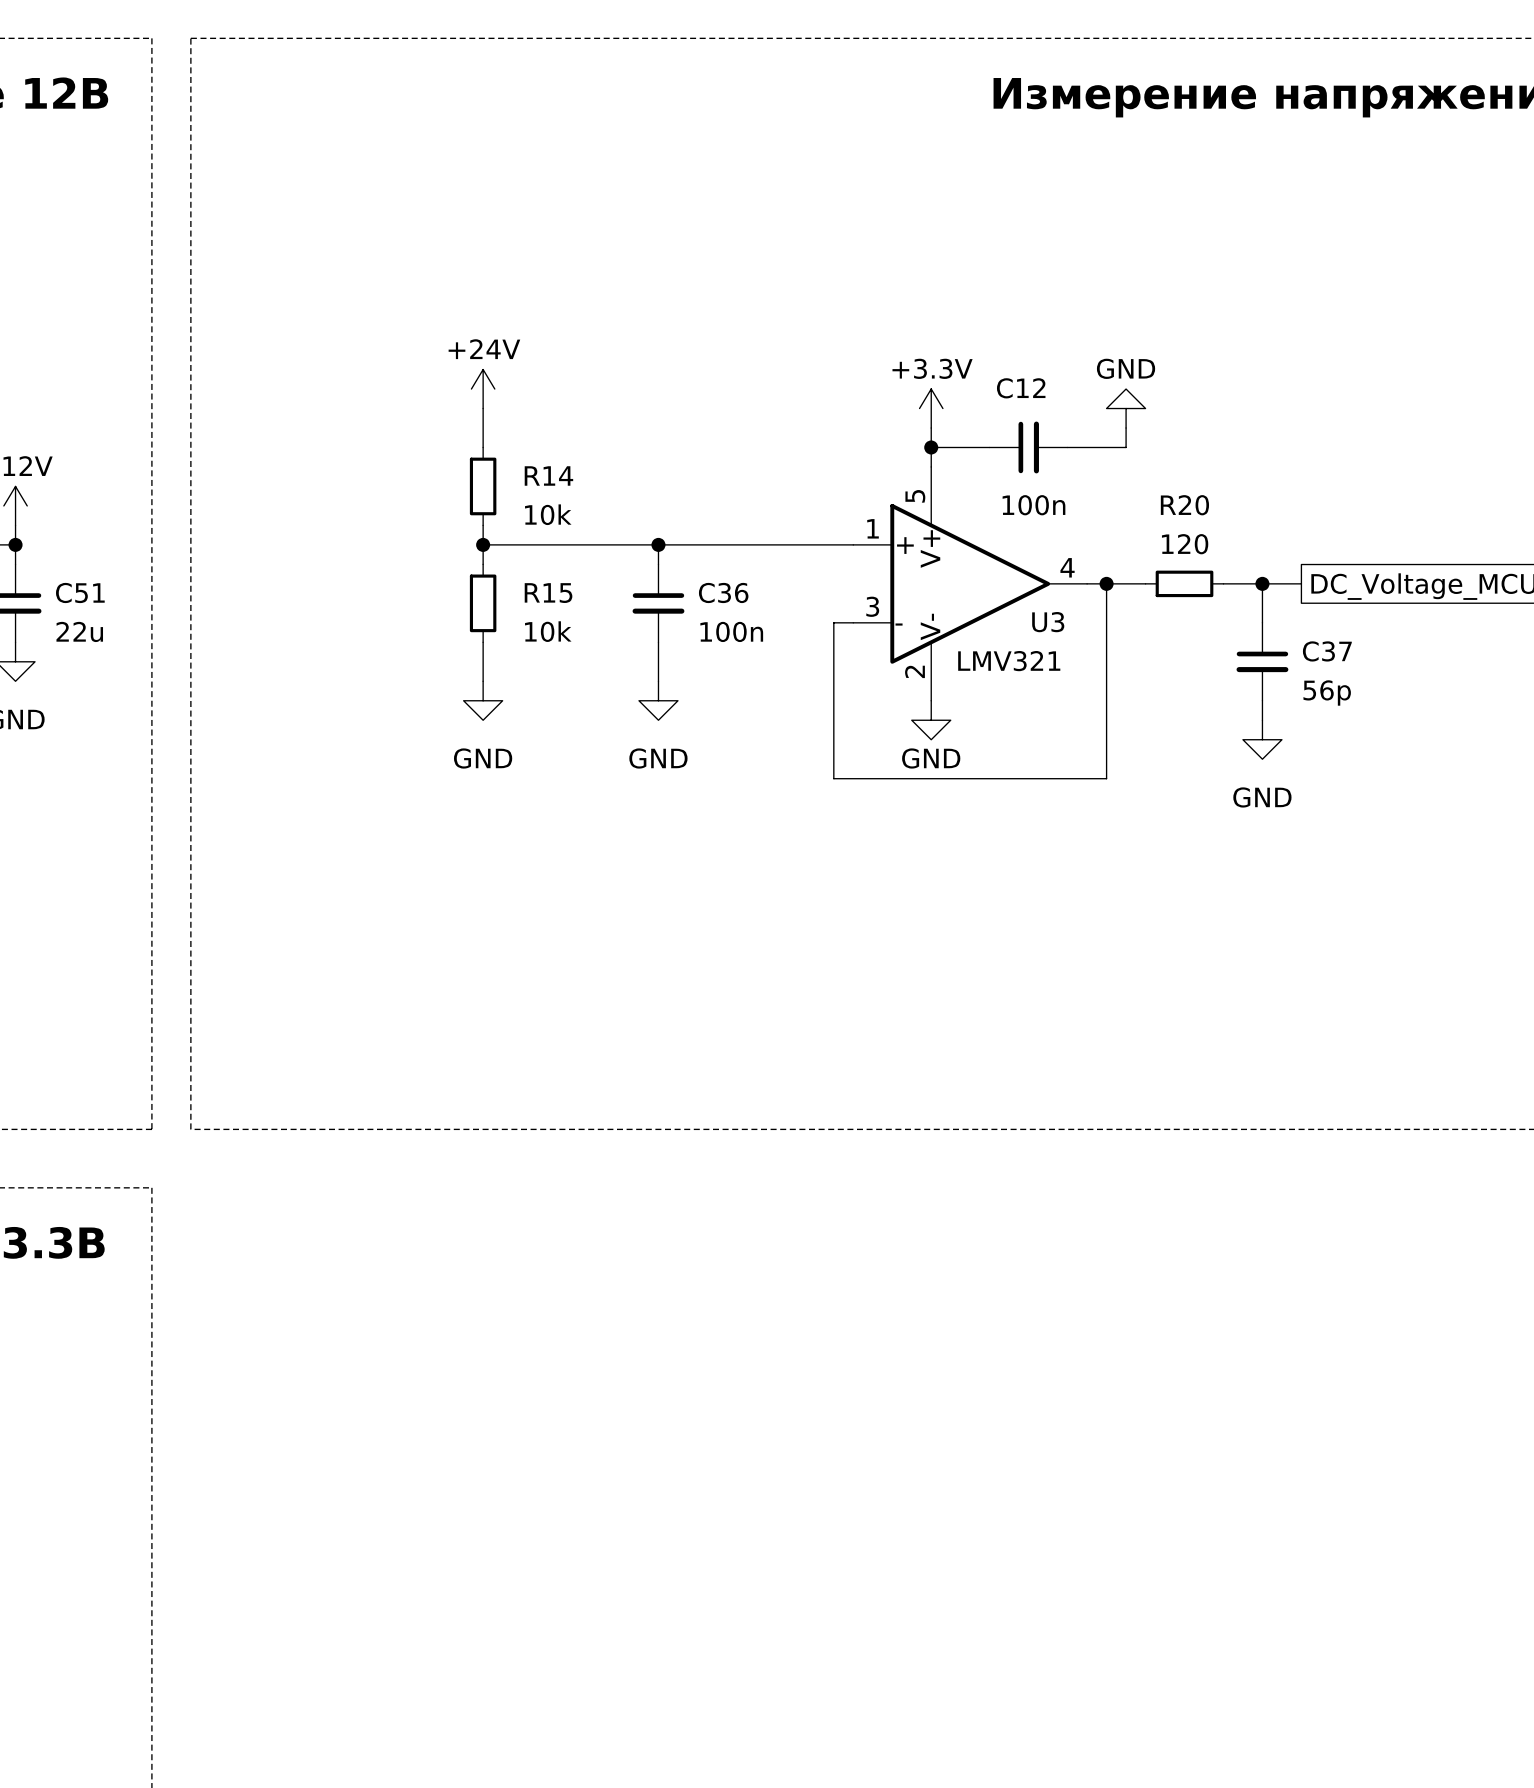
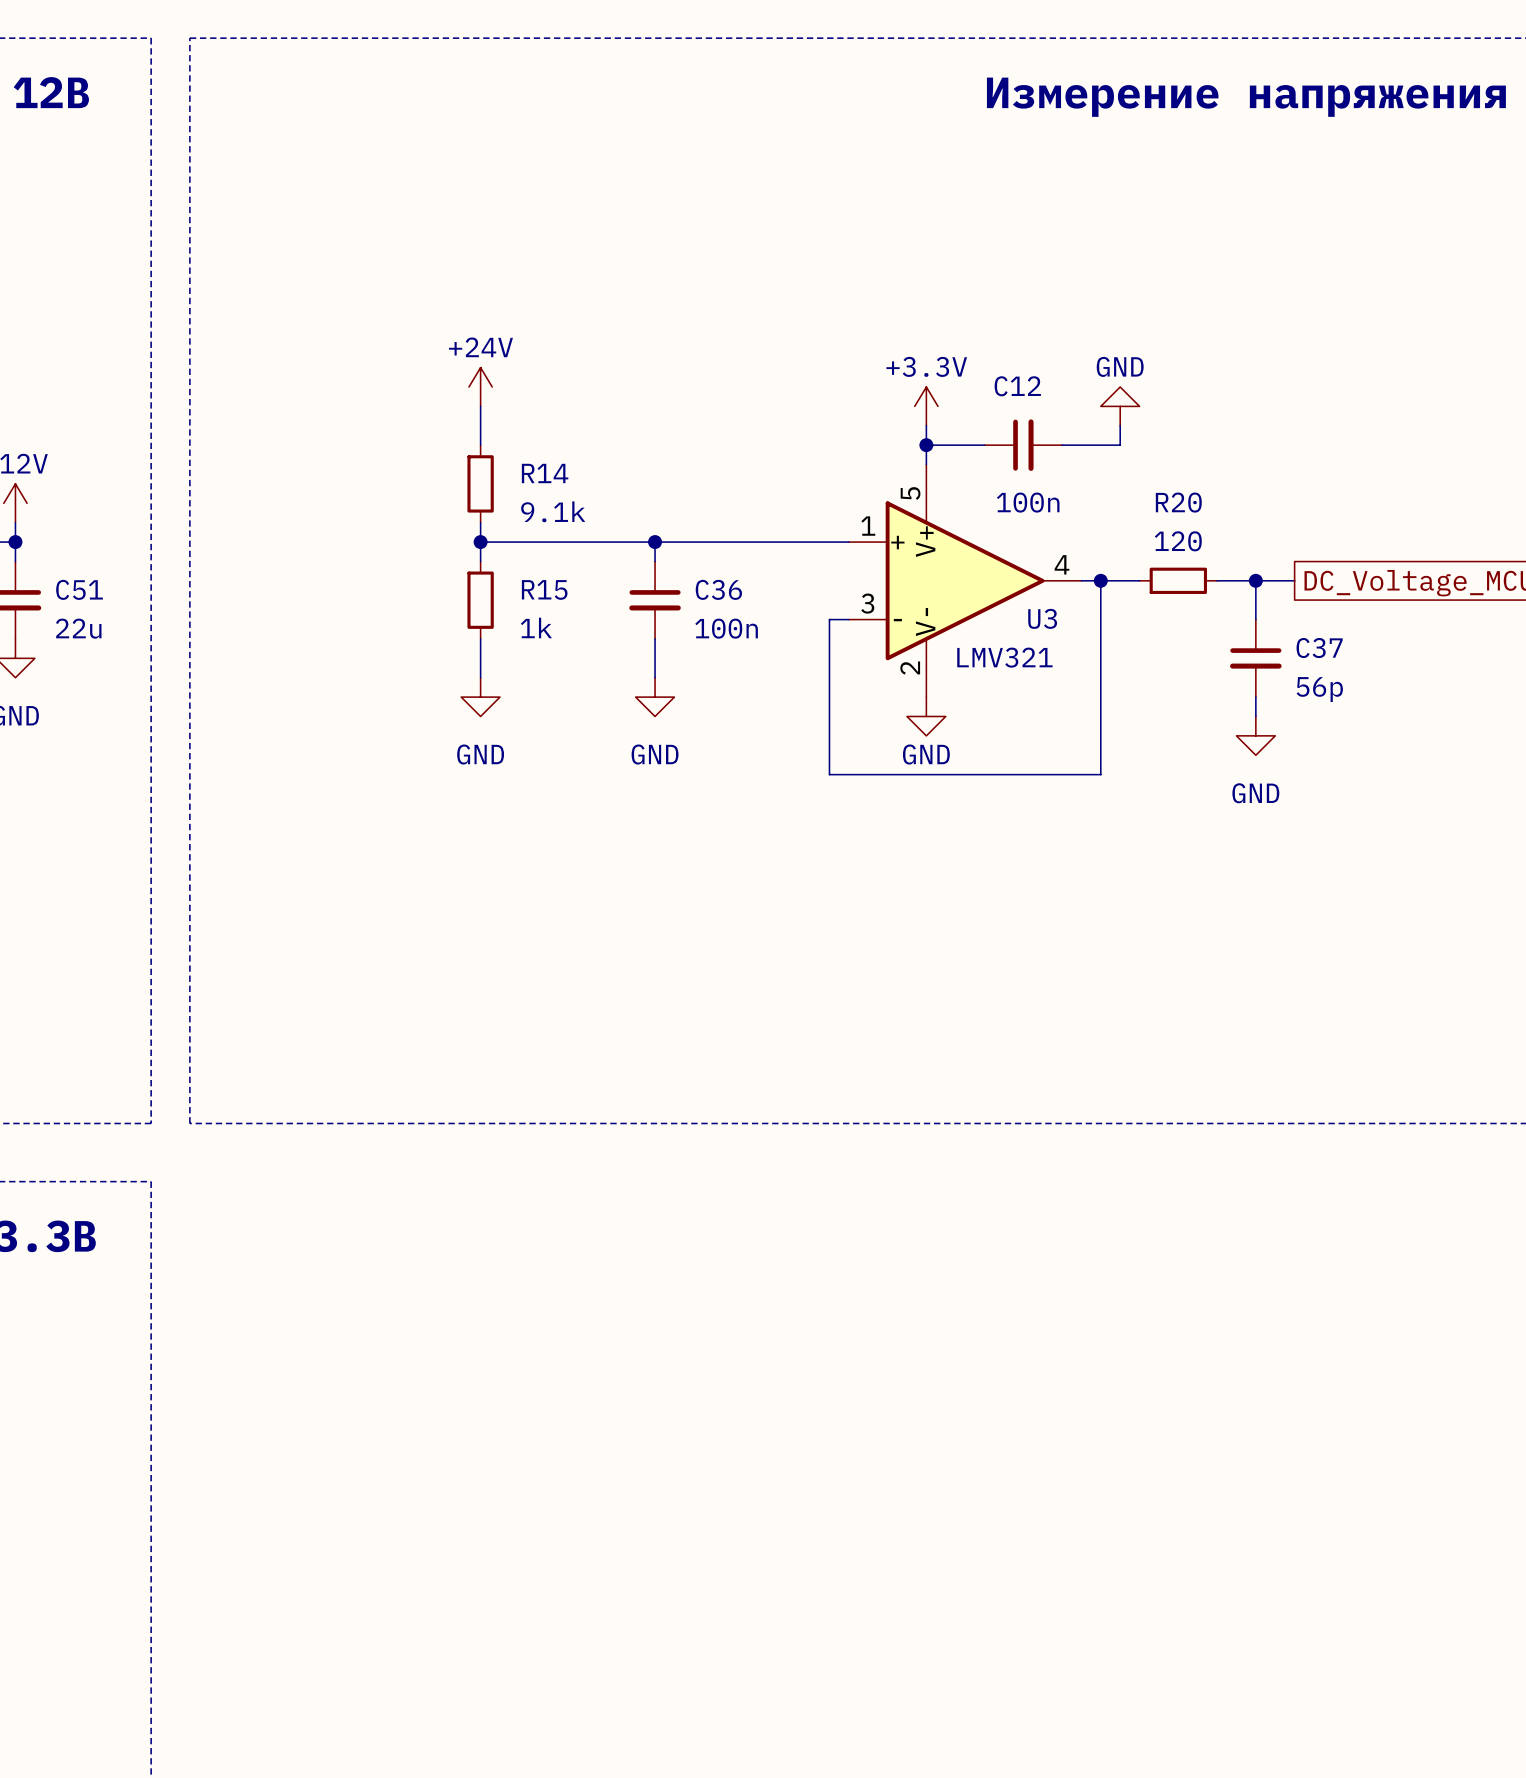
R14 value: 10k (548, 514) -> 9.1k (553, 511)
R15 value: 10k (548, 631) -> 1k (536, 627)

